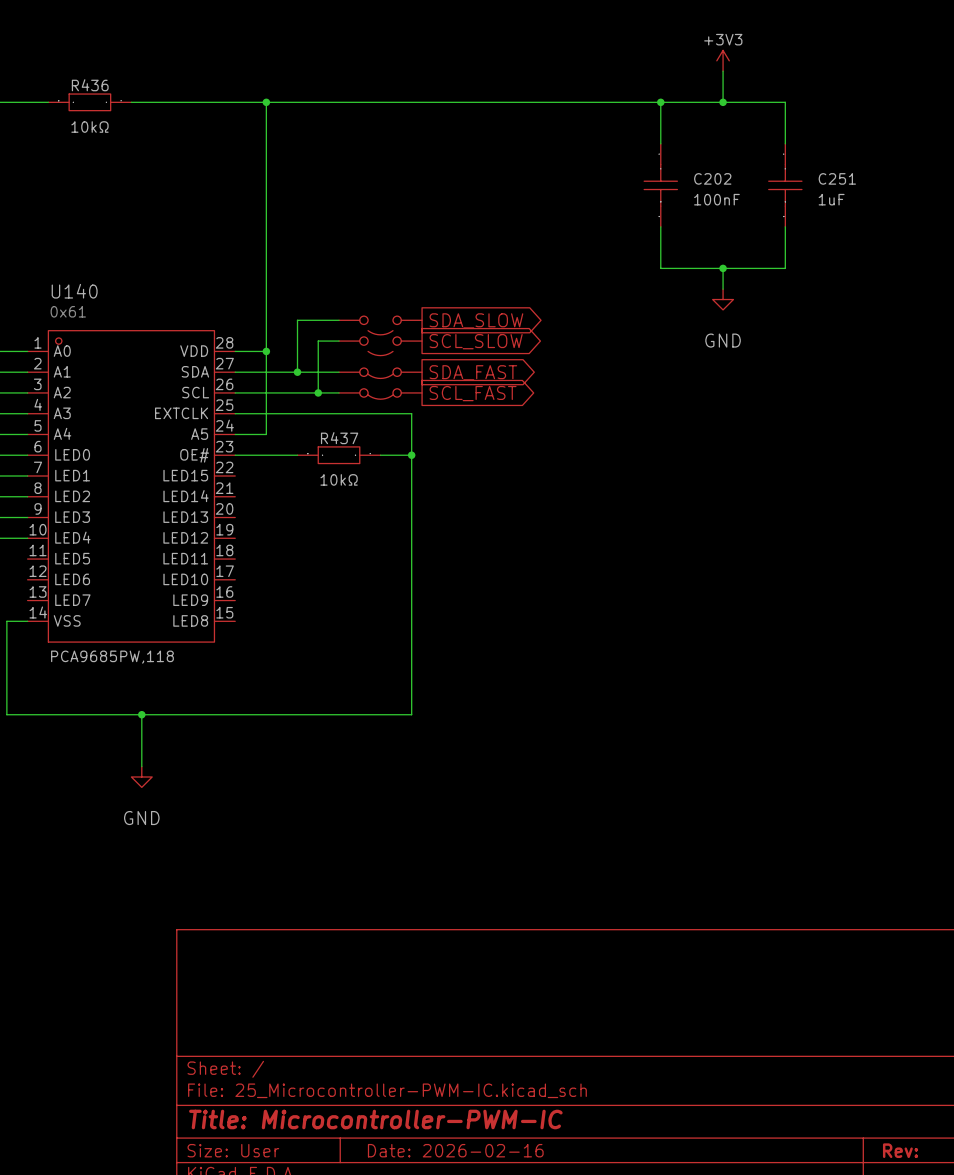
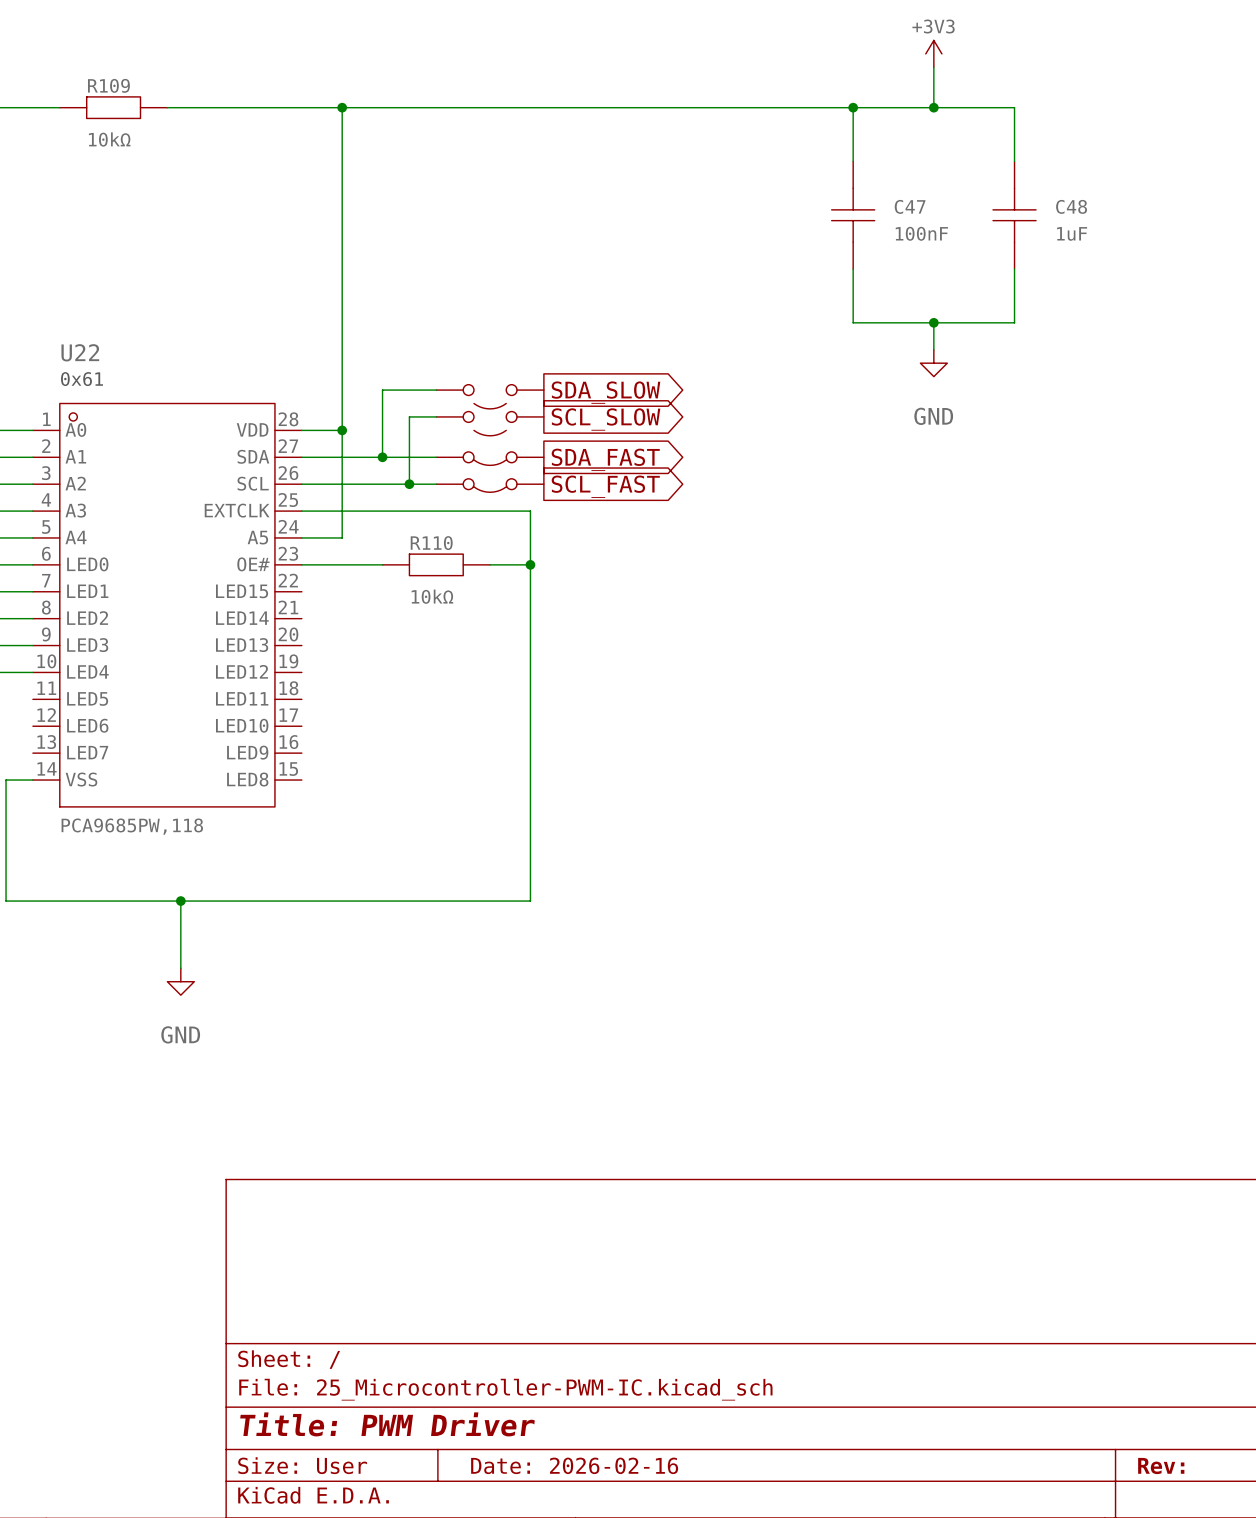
R436 name: R436 (90, 85) -> R109 (108, 85)
C202 name: C202 (712, 178) -> C47 (910, 206)
C251 name: C251 (837, 178) -> C48 (1071, 206)
U140 name: U140 (74, 291) -> U22 (80, 352)
R437 name: R437 (339, 438) -> R110 (431, 543)
title block: Title: Microcontroller-PWM-IC (375, 1119) -> Title: PWM Driver (387, 1424)

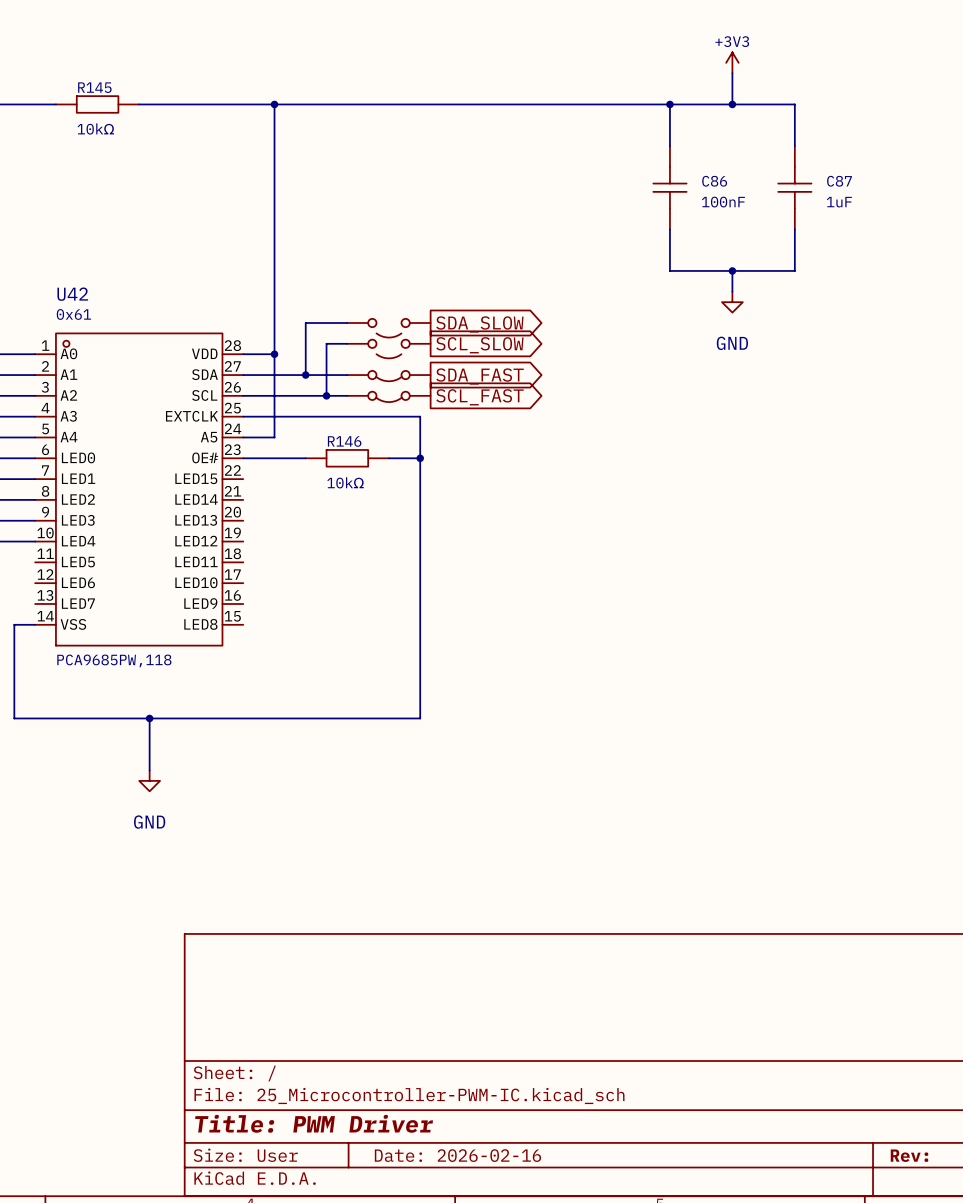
R109 name: R109 (108, 85) -> R145 (94, 87)
C47 name: C47 (910, 206) -> C86 (714, 181)
C48 name: C48 (1071, 206) -> C87 (839, 181)
U22 name: U22 (80, 352) -> U42 (72, 294)
R110 name: R110 (431, 543) -> R146 (344, 441)

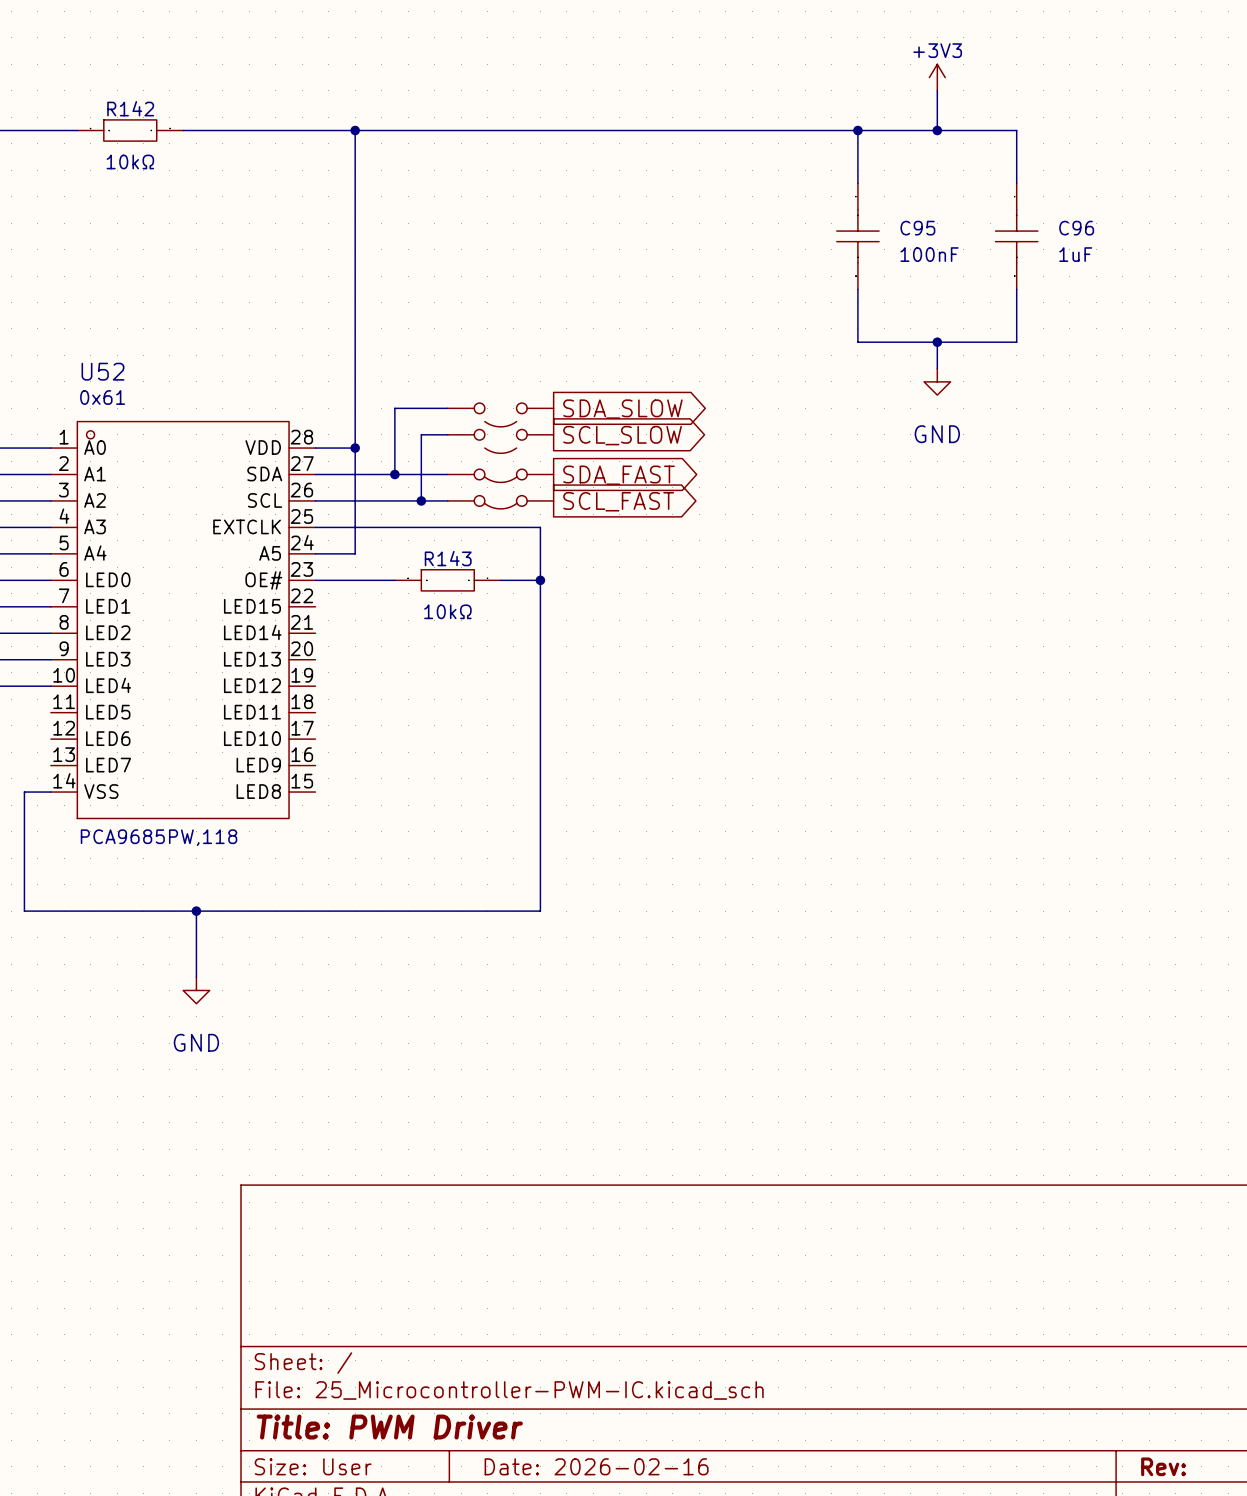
R145 name: R145 (94, 87) -> R142 (130, 108)
C86 name: C86 (714, 181) -> C95 (917, 228)
C87 name: C87 (839, 181) -> C96 (1076, 228)
U42 name: U42 (72, 294) -> U52 (103, 371)
R146 name: R146 (344, 441) -> R143 (448, 558)

